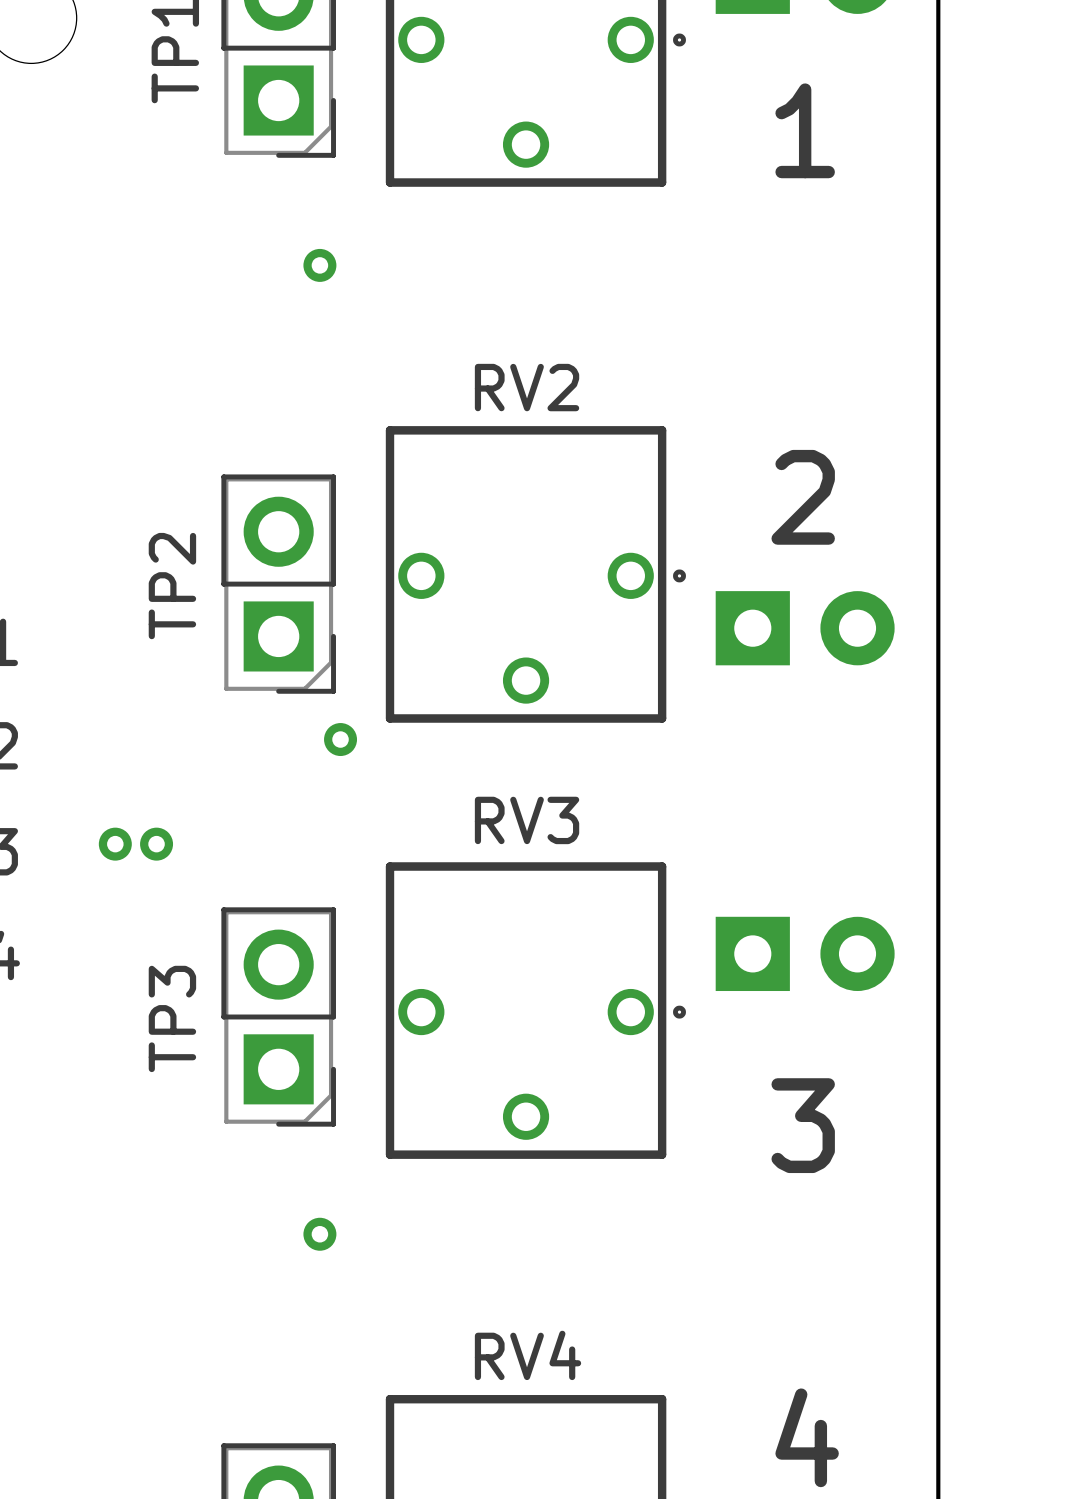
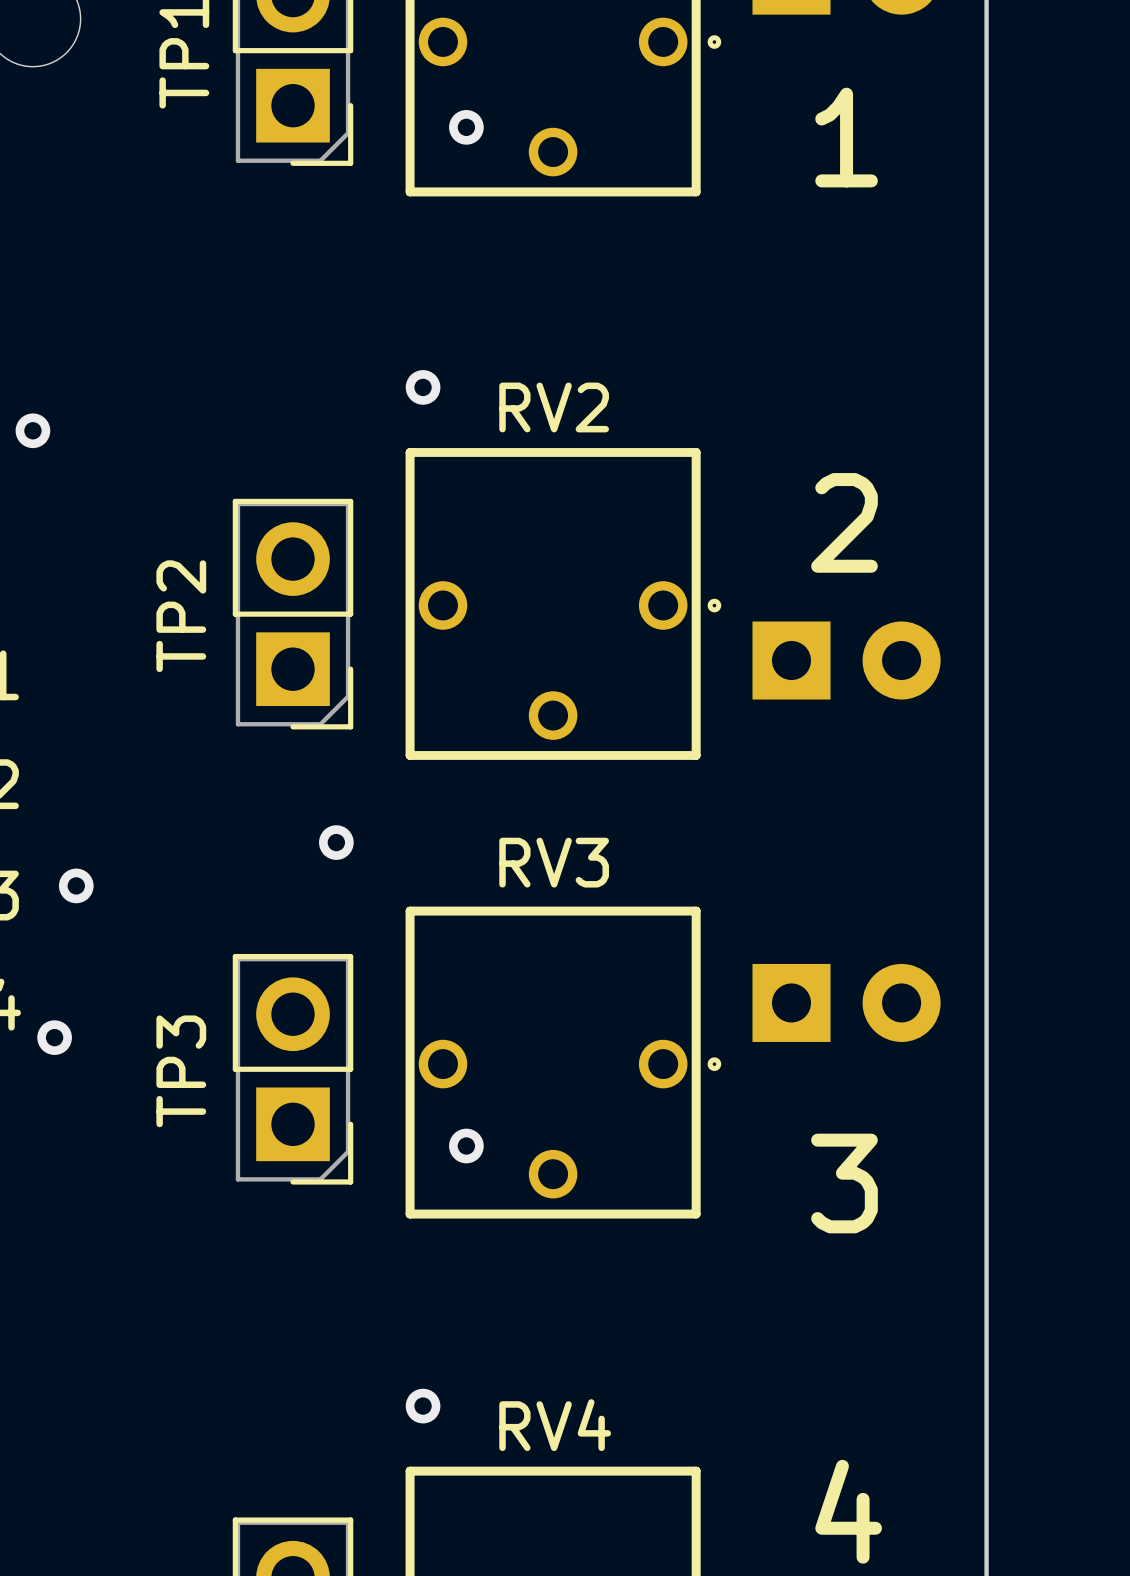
via: none -> (466, 127)
via: (319, 265) -> none
via: none -> (423, 387)
via: none -> (32, 430)
via position: (340, 739) -> (336, 842)
via: none -> (76, 885)
via: (115, 844) -> none
via: (156, 844) -> none
via: none -> (54, 1037)
via: none -> (466, 1146)
via: (319, 1234) -> none
via: none -> (423, 1406)

